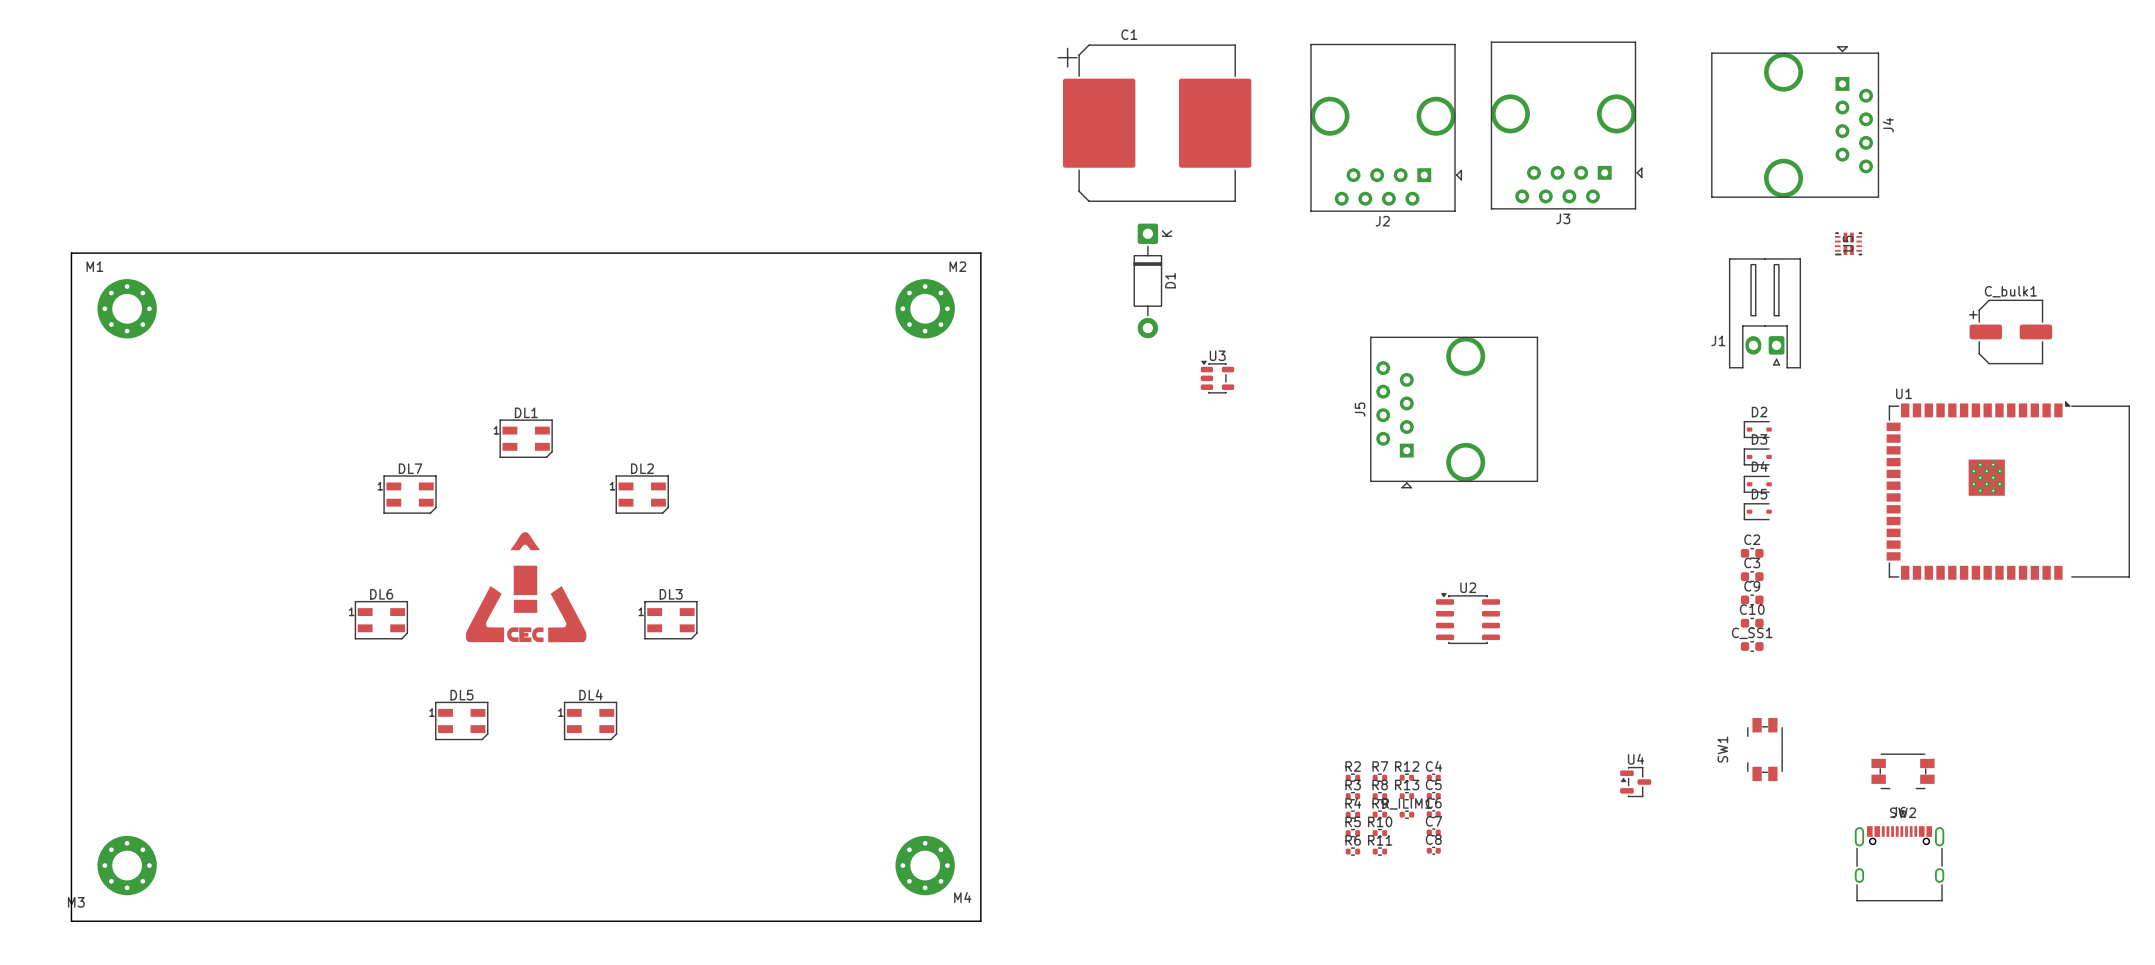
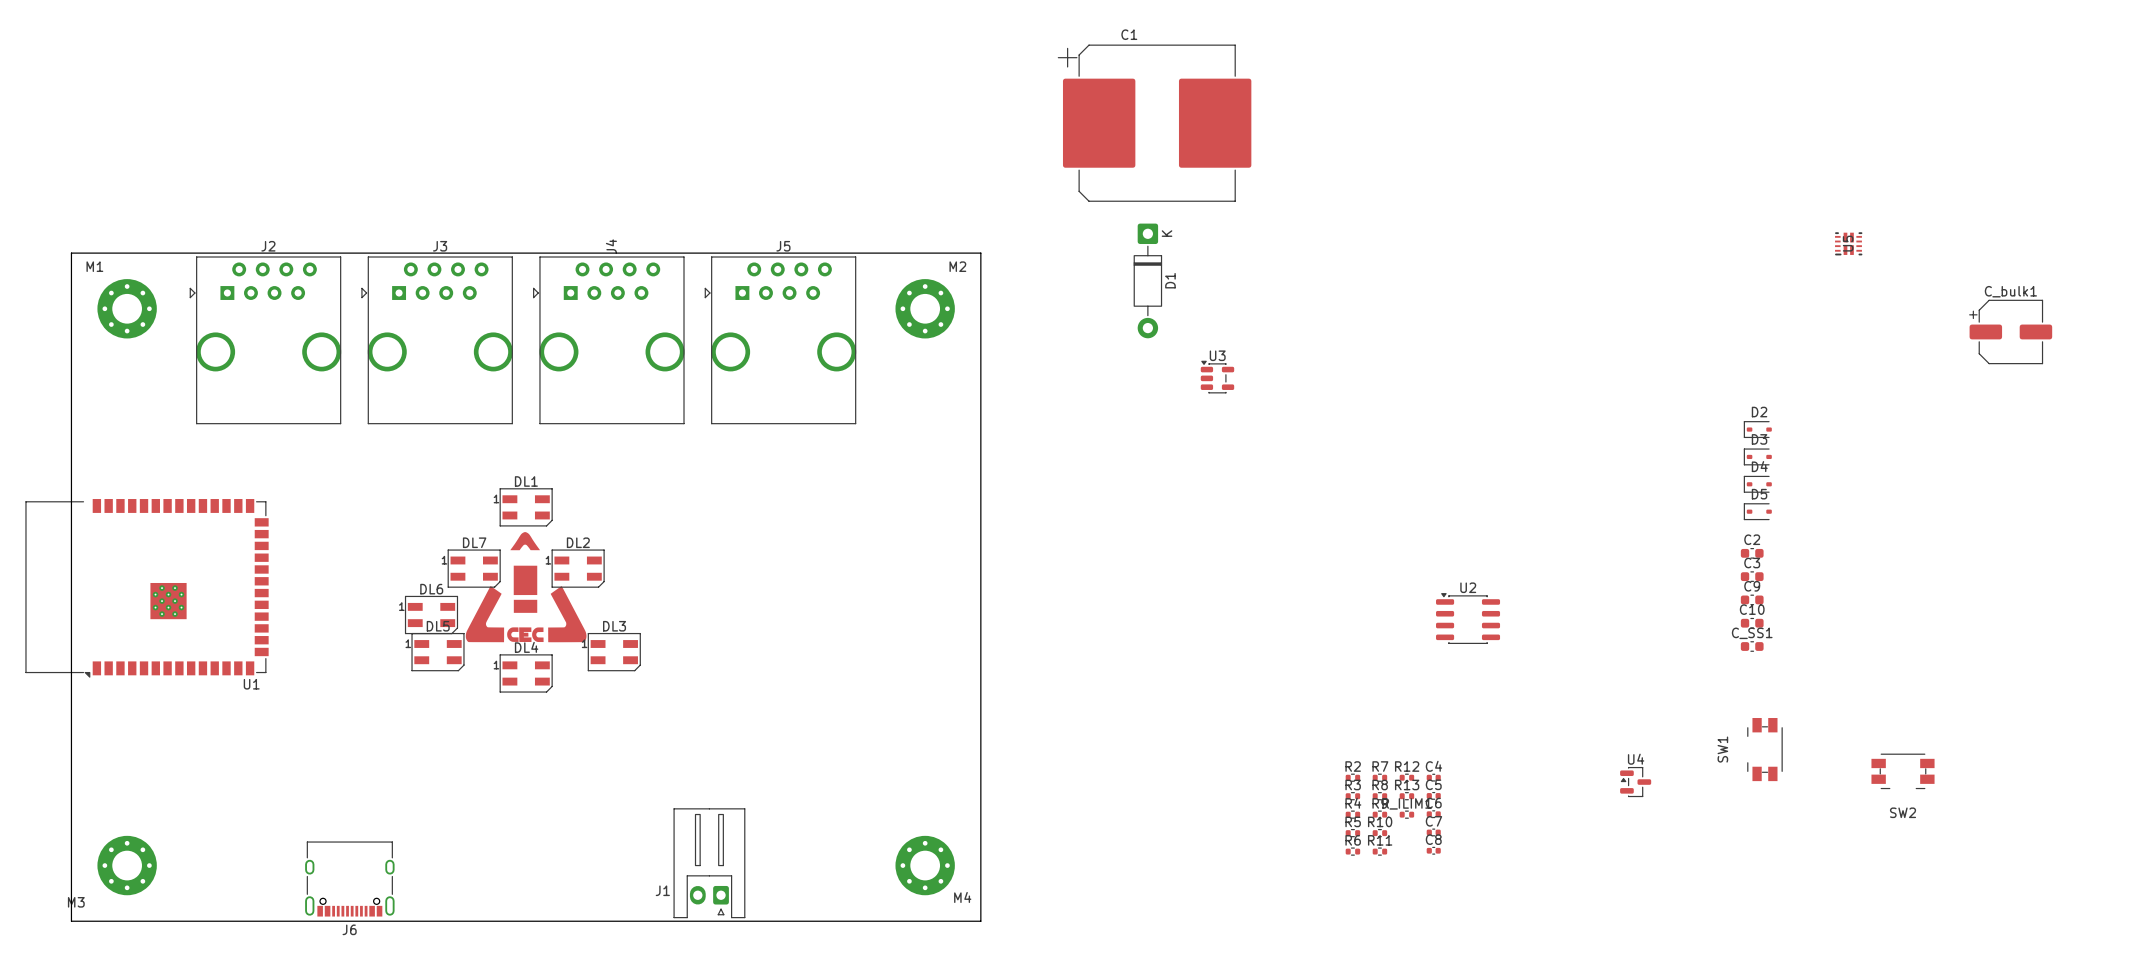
J4 rotation: 0° (1795, 122) -> 90° counterclockwise (608, 340)
J4 position: (1795, 122) -> (608, 340)
J3 rotation: 0° (1566, 125) -> 180° (437, 340)
J3 position: (1566, 125) -> (437, 340)
J2 rotation: 0° (1386, 127) -> 180° (265, 340)
J2 position: (1386, 127) -> (265, 340)
J1 position: (1764, 313) -> (709, 863)
J5 rotation: 0° (1454, 412) -> 90° clockwise (780, 340)
J5 position: (1454, 412) -> (780, 340)
DL1 position: (526, 438) -> (526, 507)
U1 rotation: 0° (2008, 490) -> 180° (147, 588)
U1 position: (2008, 490) -> (147, 588)
DL7 position: (410, 494) -> (474, 568)
DL2 position: (642, 494) -> (578, 568)
DL6 position: (381, 620) -> (431, 615)
DL3 position: (670, 620) -> (614, 652)
DL5 position: (461, 720) -> (437, 652)
DL4 position: (590, 720) -> (526, 673)
J6 rotation: 0° (1899, 863) -> 180° (349, 879)
J6 position: (1899, 863) -> (349, 879)

